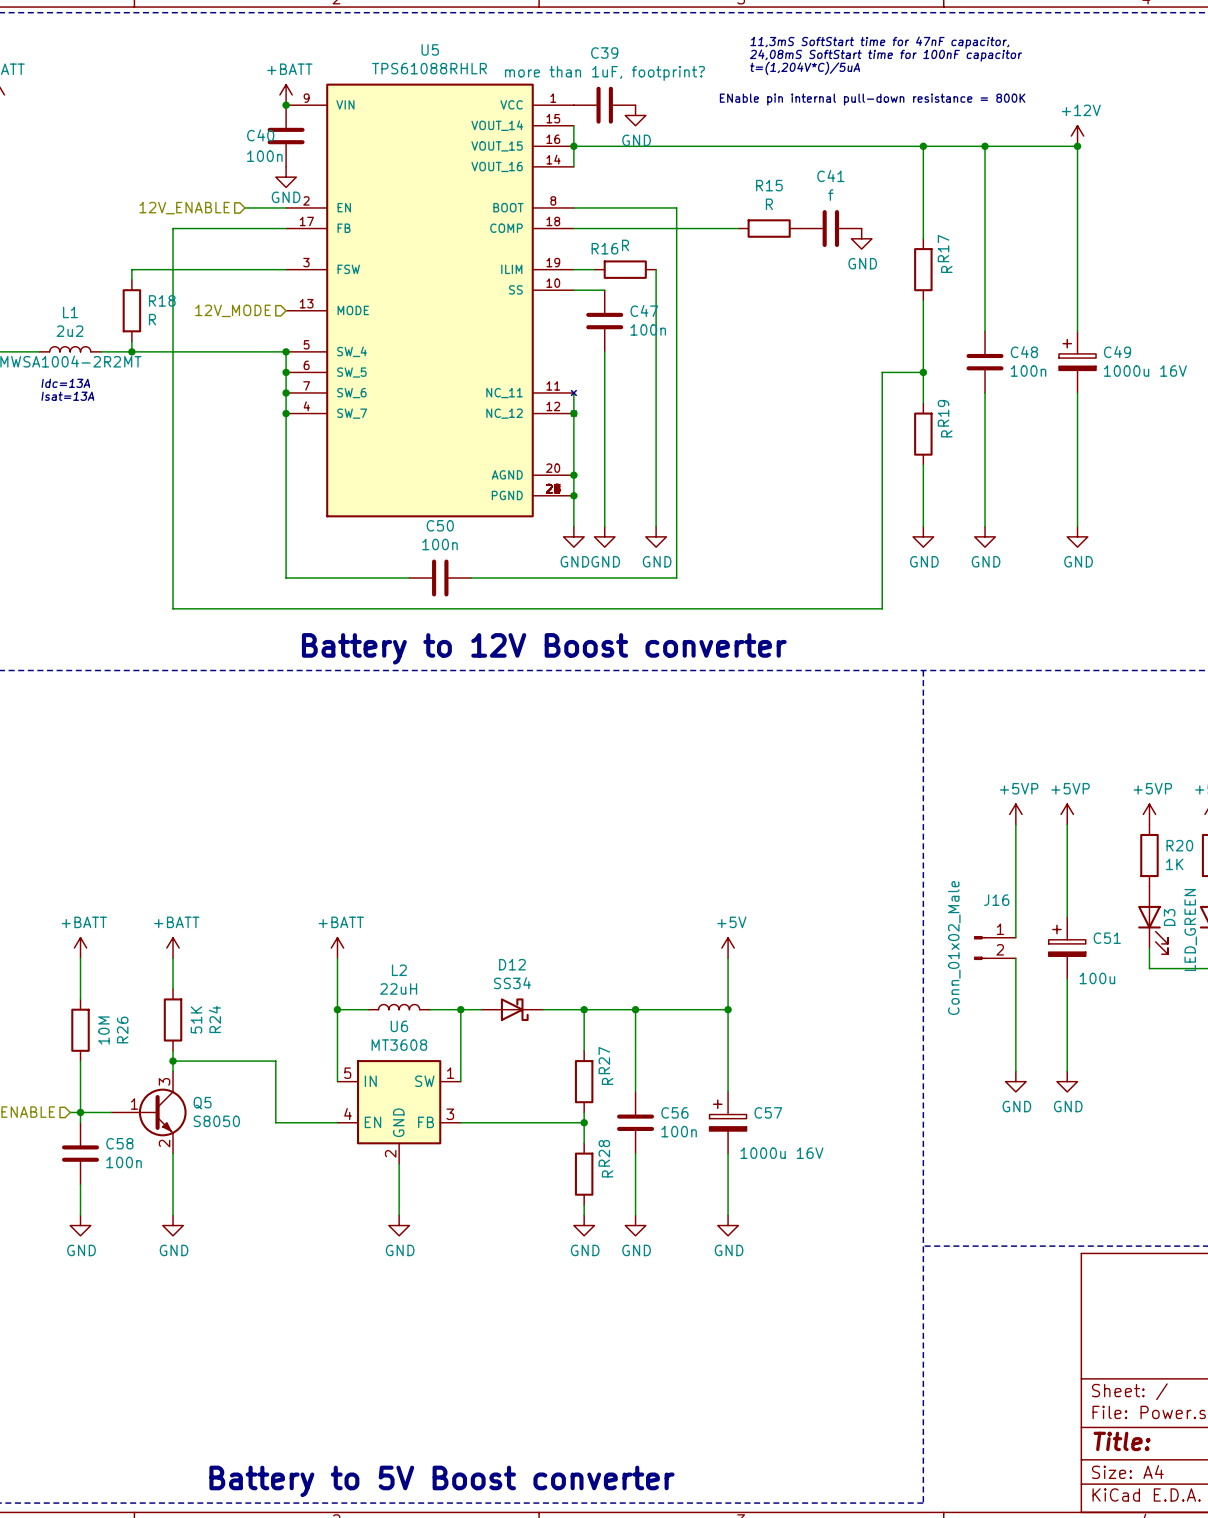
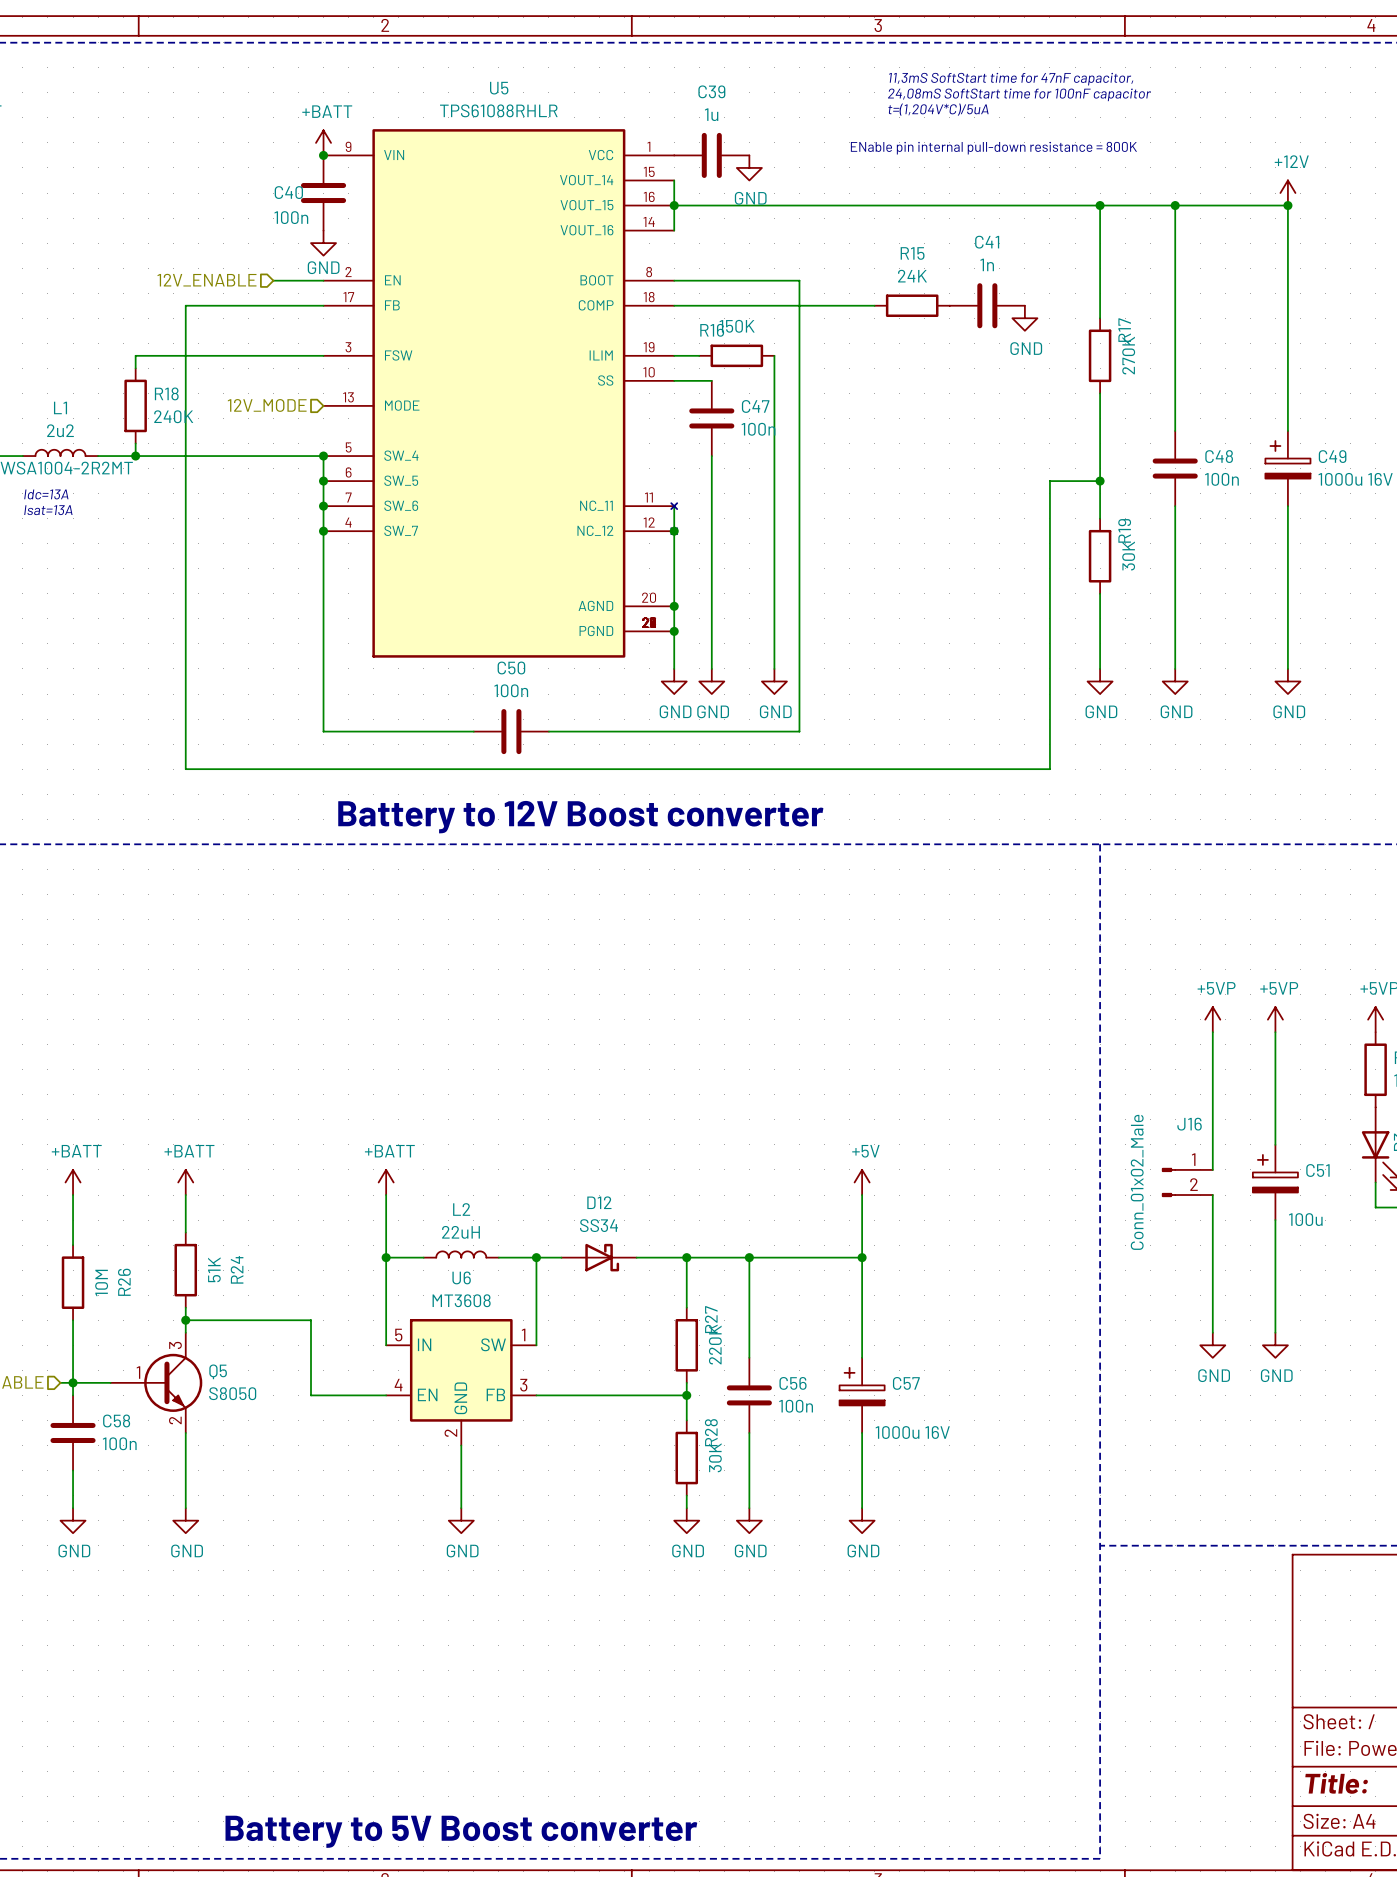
C39 value: more than 1uF, footprint? (604, 73) -> 1u (711, 114)
C41 value: f (830, 195) -> 1n (987, 264)
R15 value: R (769, 204) -> 24K (912, 276)
R16 value: R (625, 245) -> 150K (737, 326)
R17 value: R (946, 269) -> 270K (1128, 355)
R18 value: R (152, 319) -> 240K (173, 416)
R19 value: R (946, 433) -> 30K (1128, 556)
R27 value: R (607, 1081) -> 220K (715, 1345)
R28 value: R (607, 1173) -> 30K (715, 1457)

